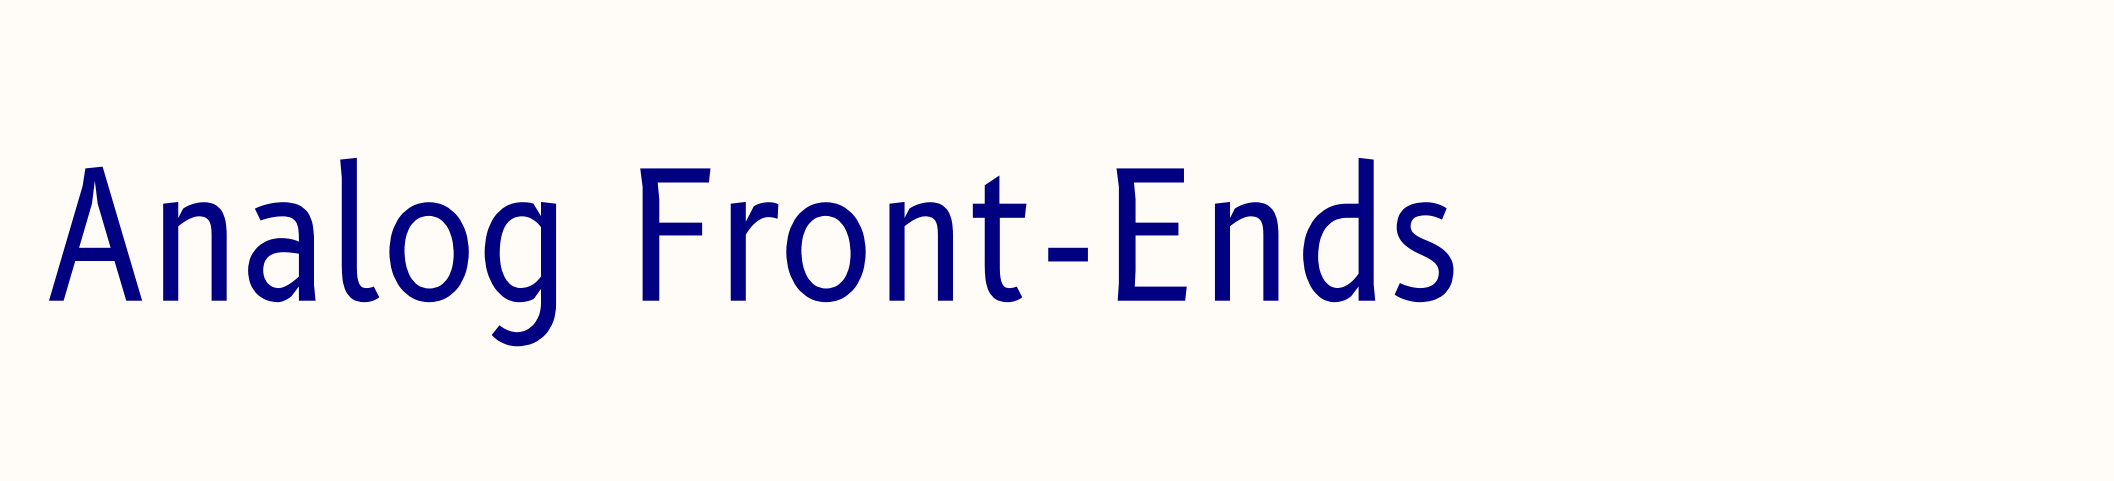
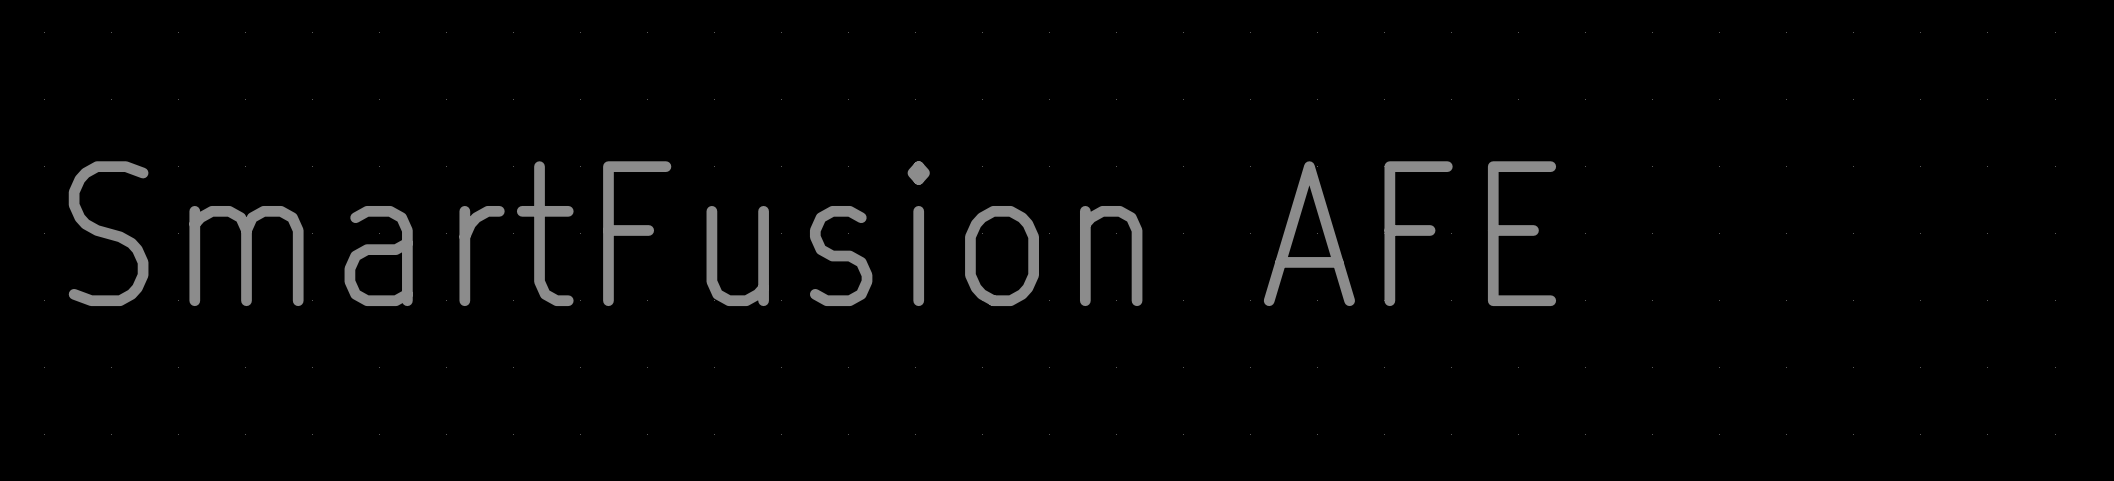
text: Analog Front-Ends (751, 252) -> SmartFusion AFE (812, 233)

